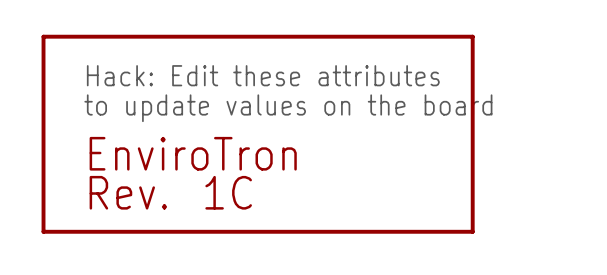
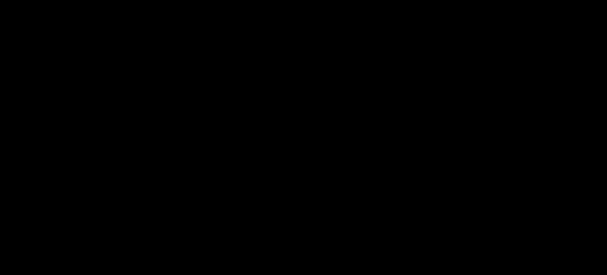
part: (258, 134) -> none

